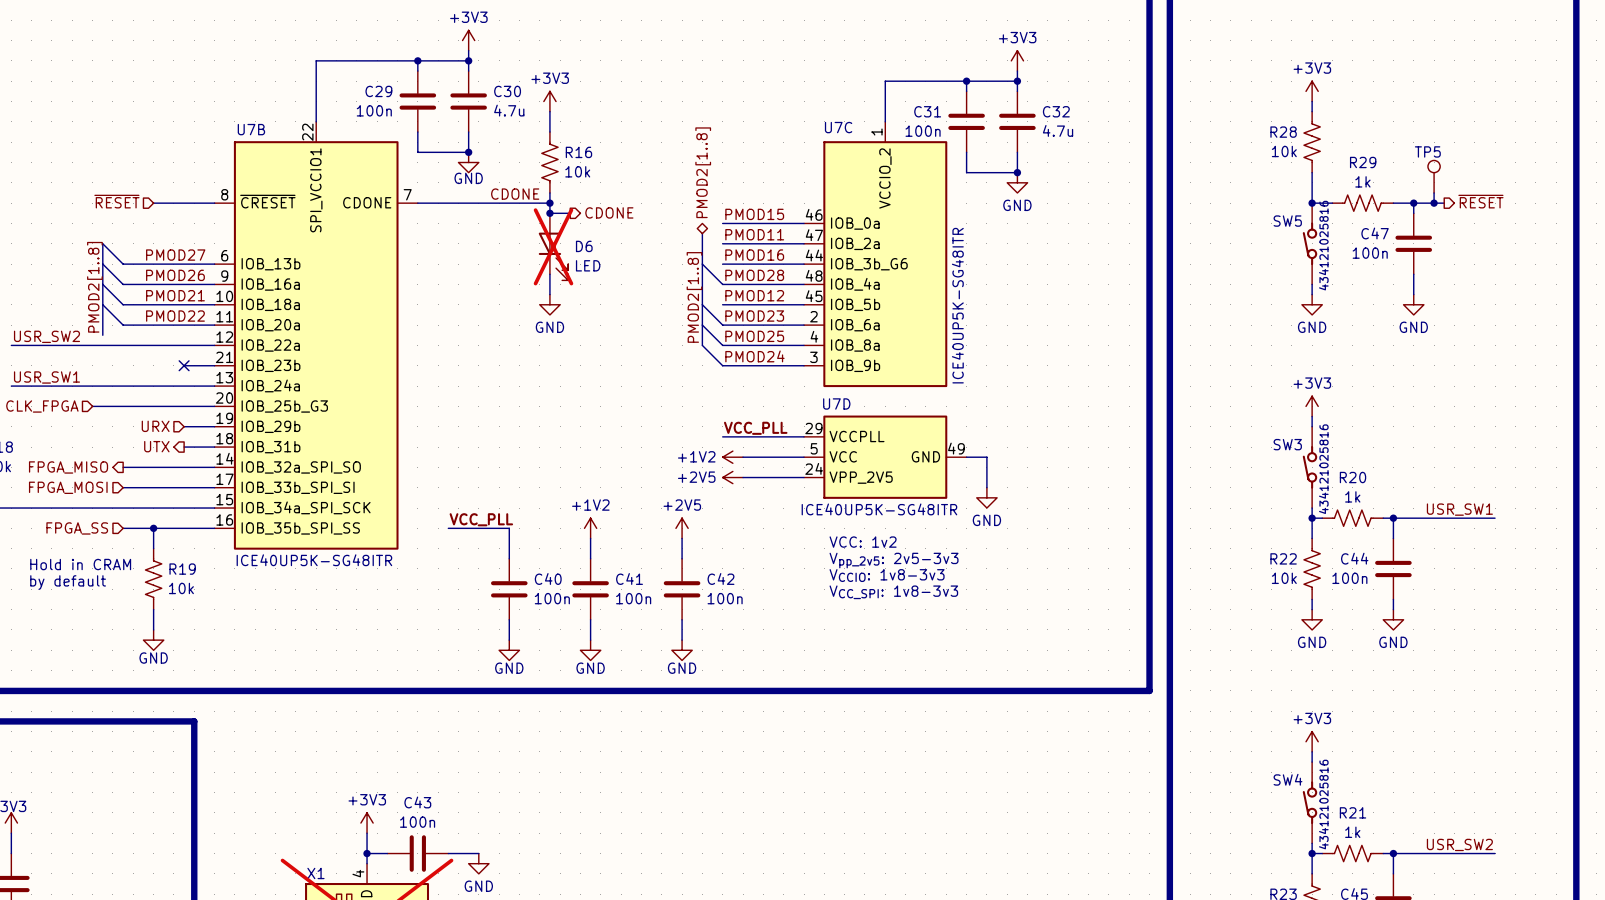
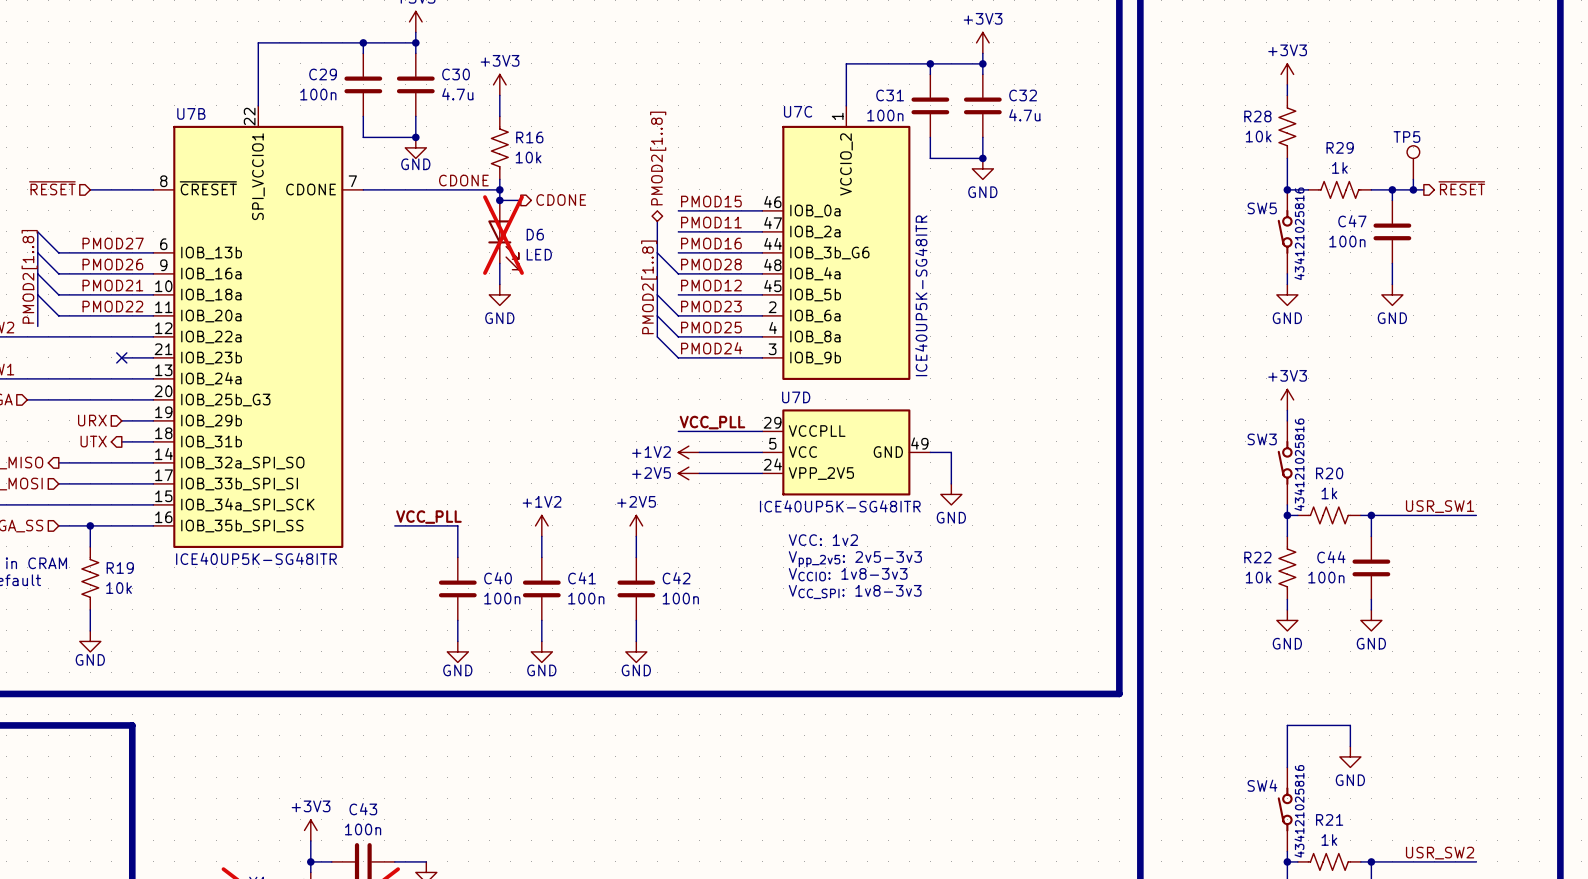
power symbol: +3V3 (1312, 741) -> none
wire: none -> (1350, 746) (1350, 725) (1287, 725) (1287, 756)
power symbol: none -> GND (1350, 756)

